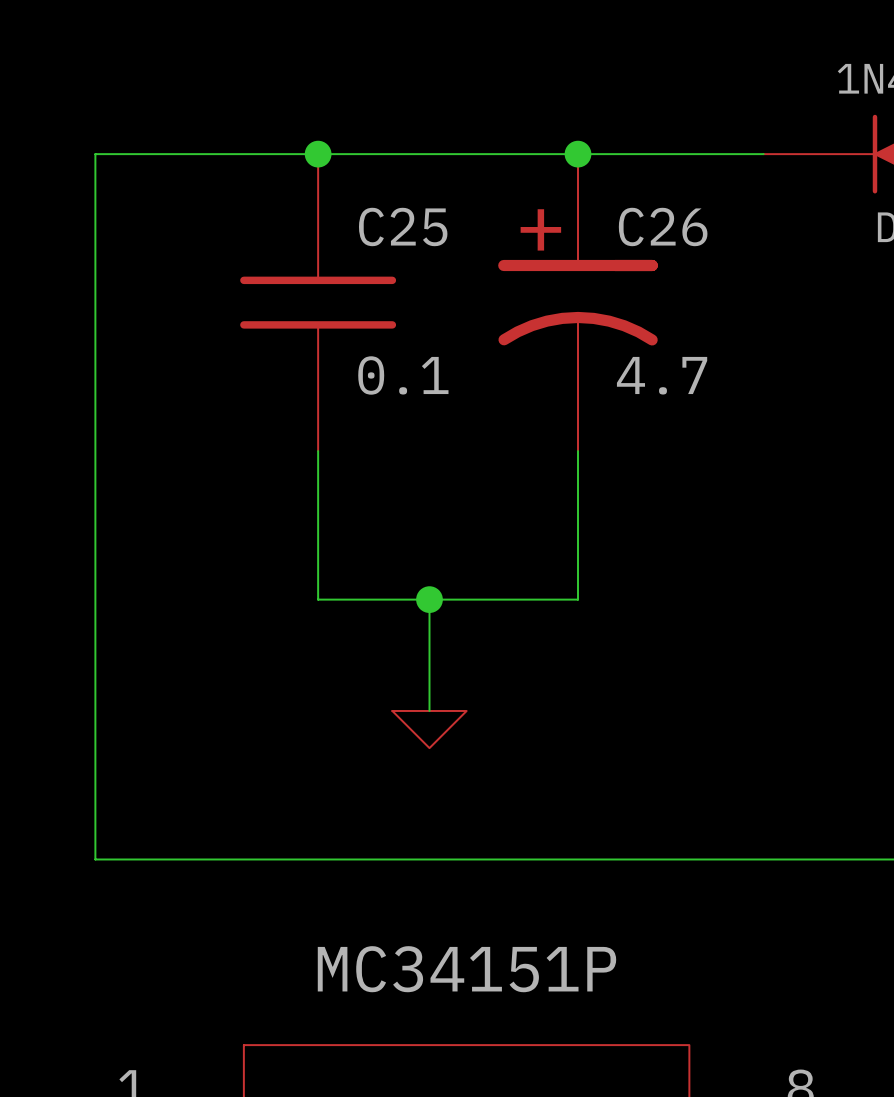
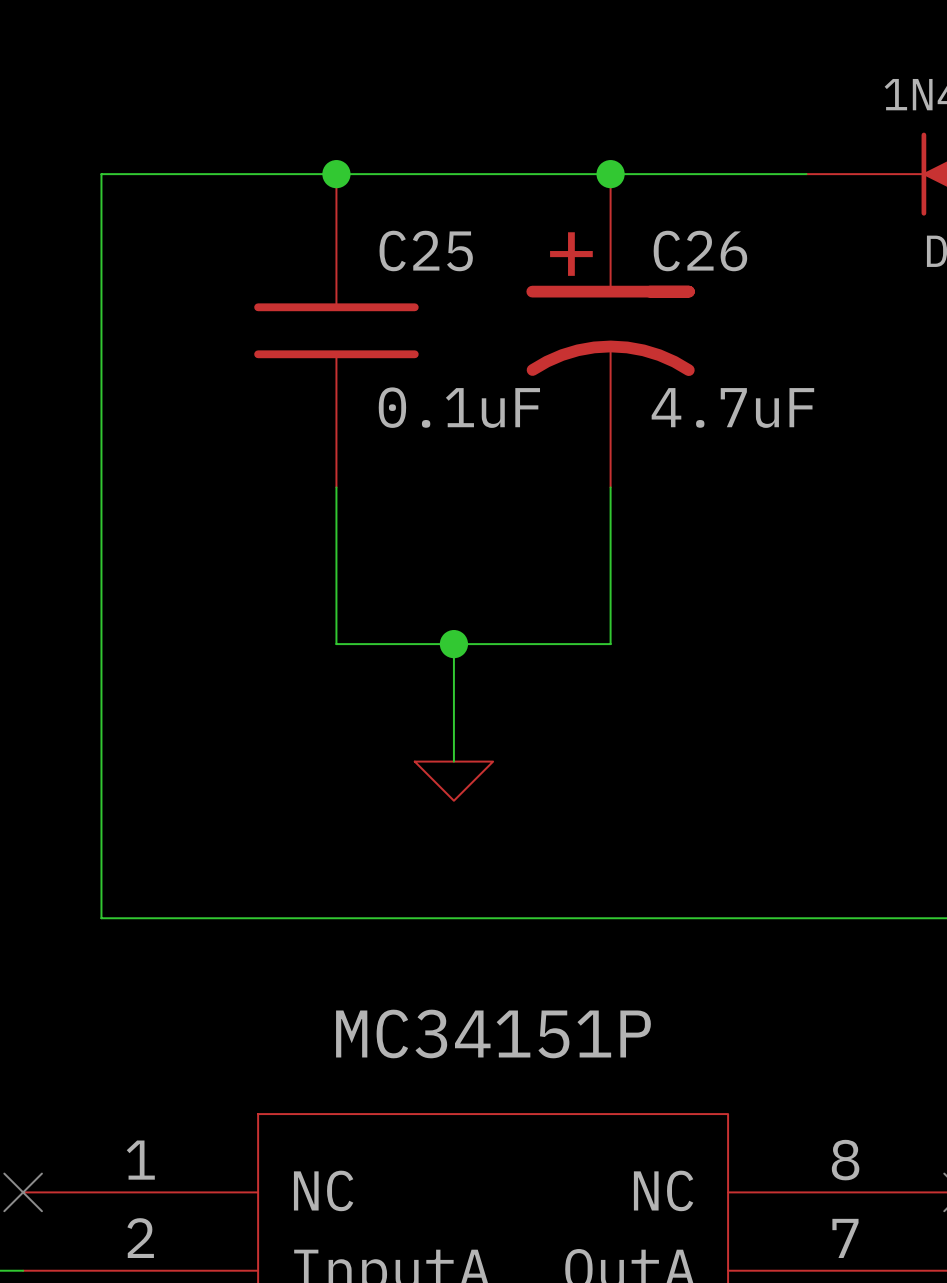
C25 value: 0.1 (403, 375) -> 0.1uF (459, 407)
C26 value: 4.7 (662, 375) -> 4.7uF (732, 407)

